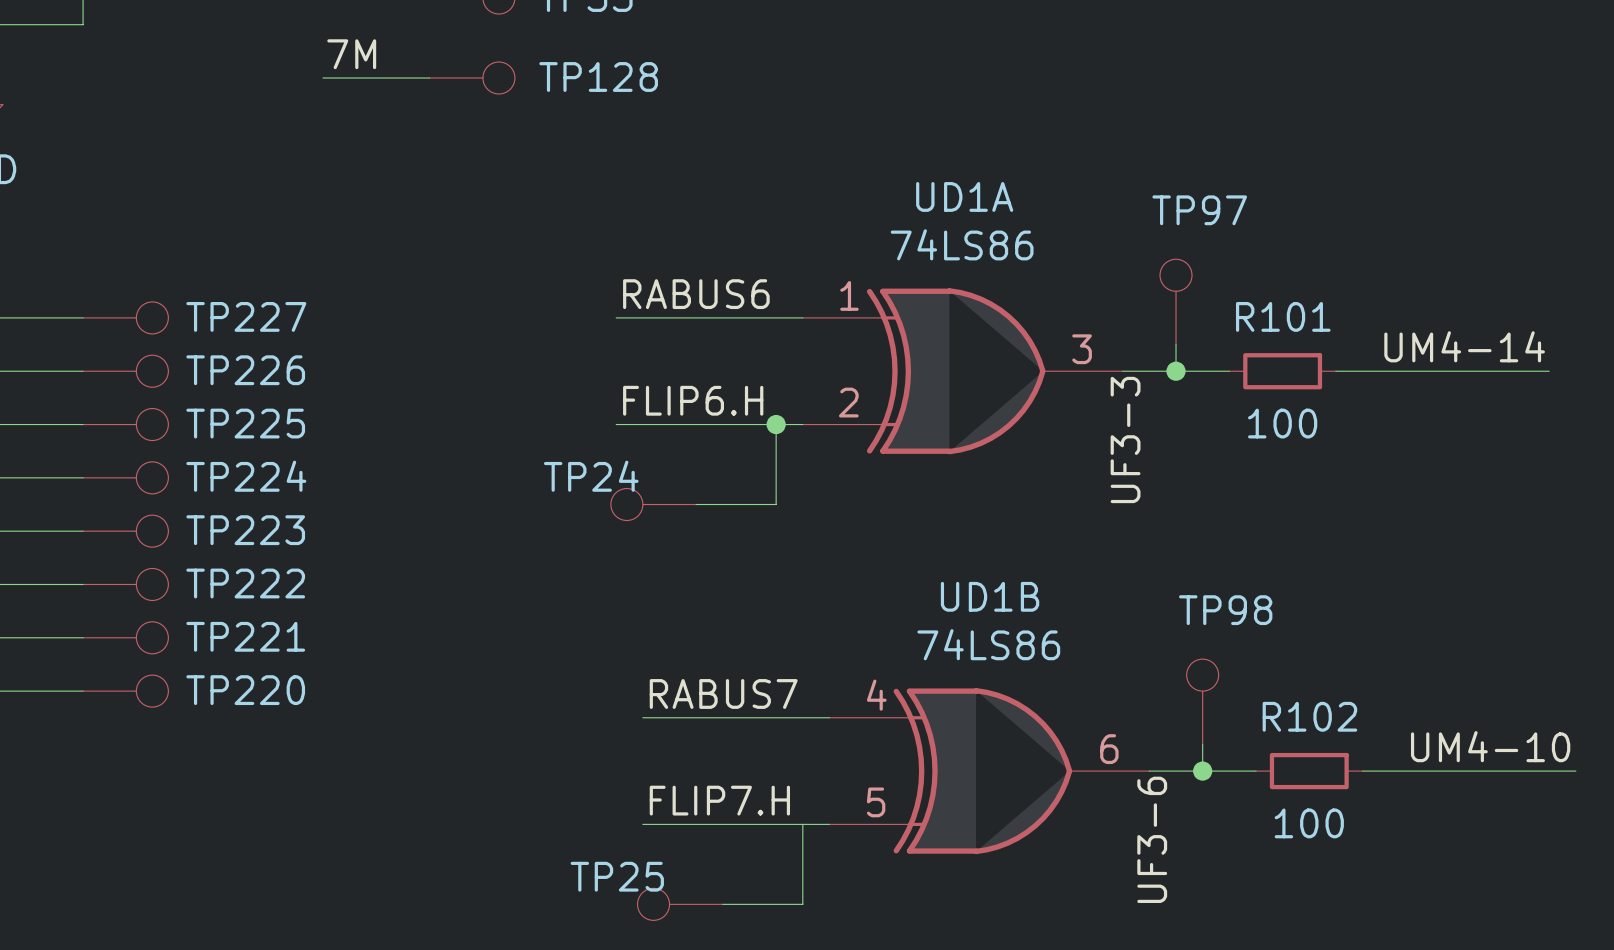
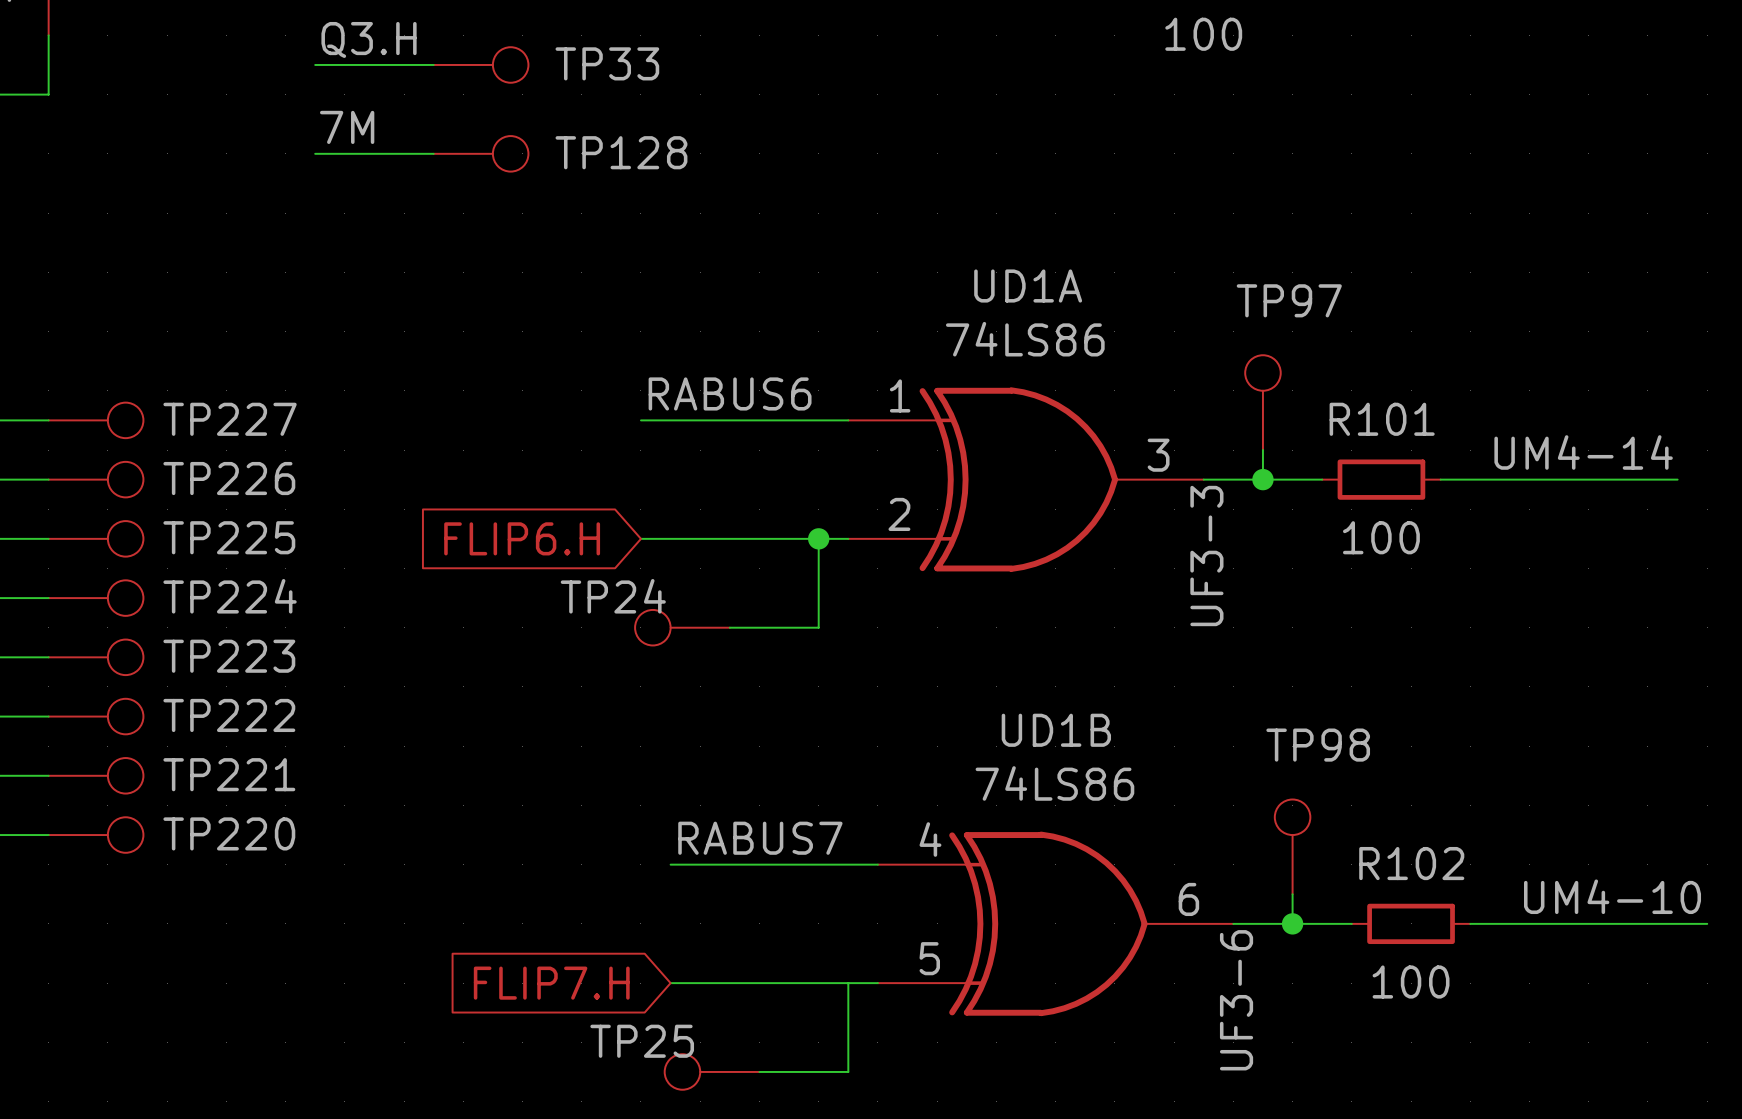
label: FLIP6.H (693, 400) -> none
global label: none -> FLIP6.H (522, 538)
label: FLIP7.H (719, 800) -> none
global label: none -> FLIP7.H (551, 983)

